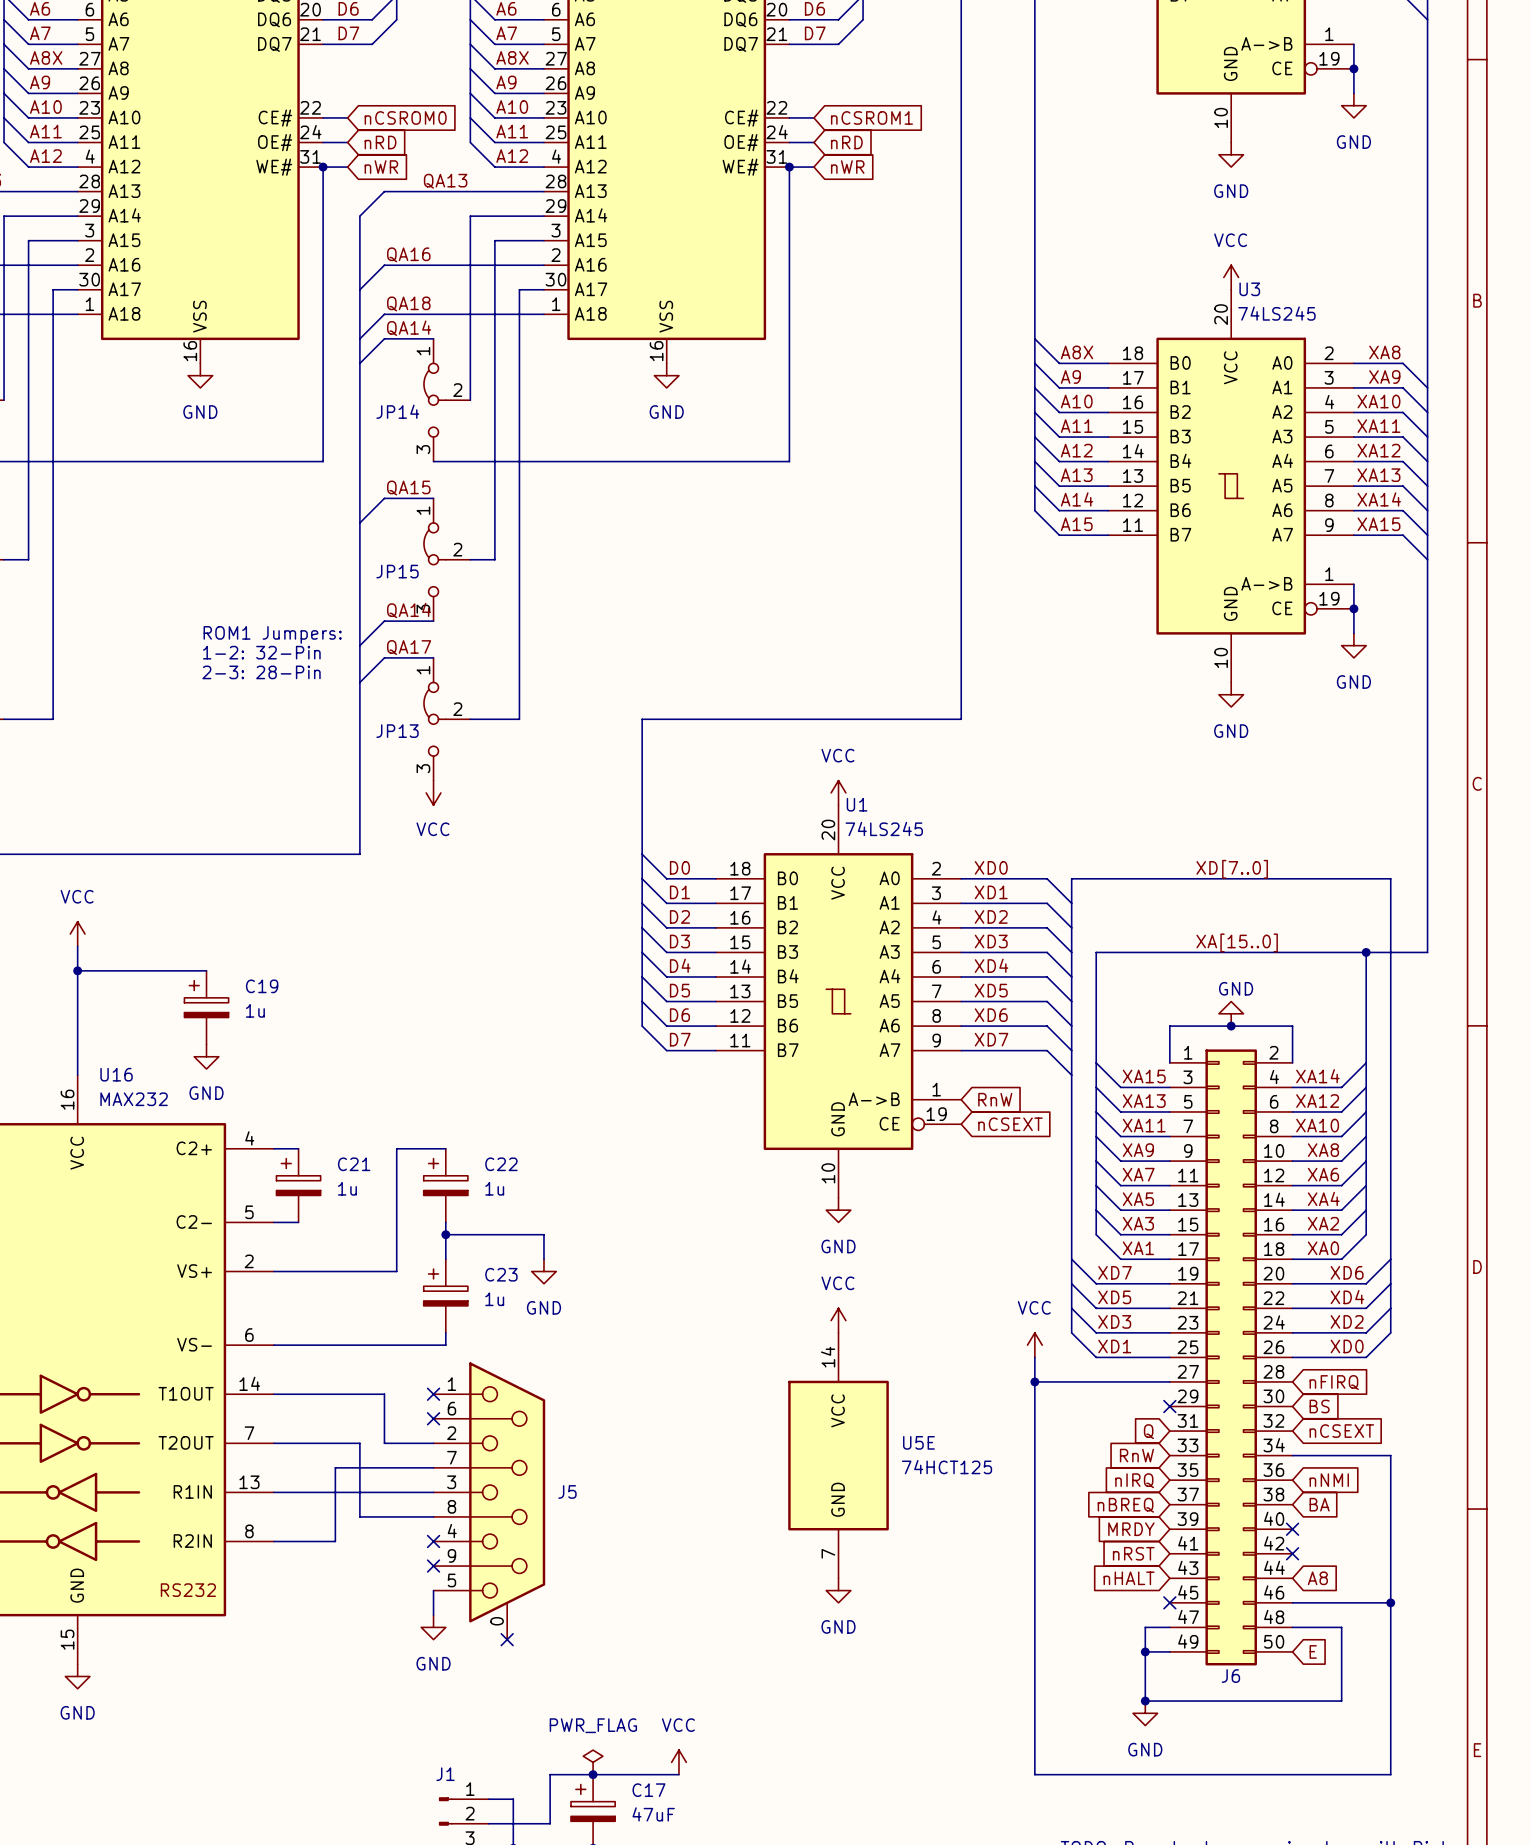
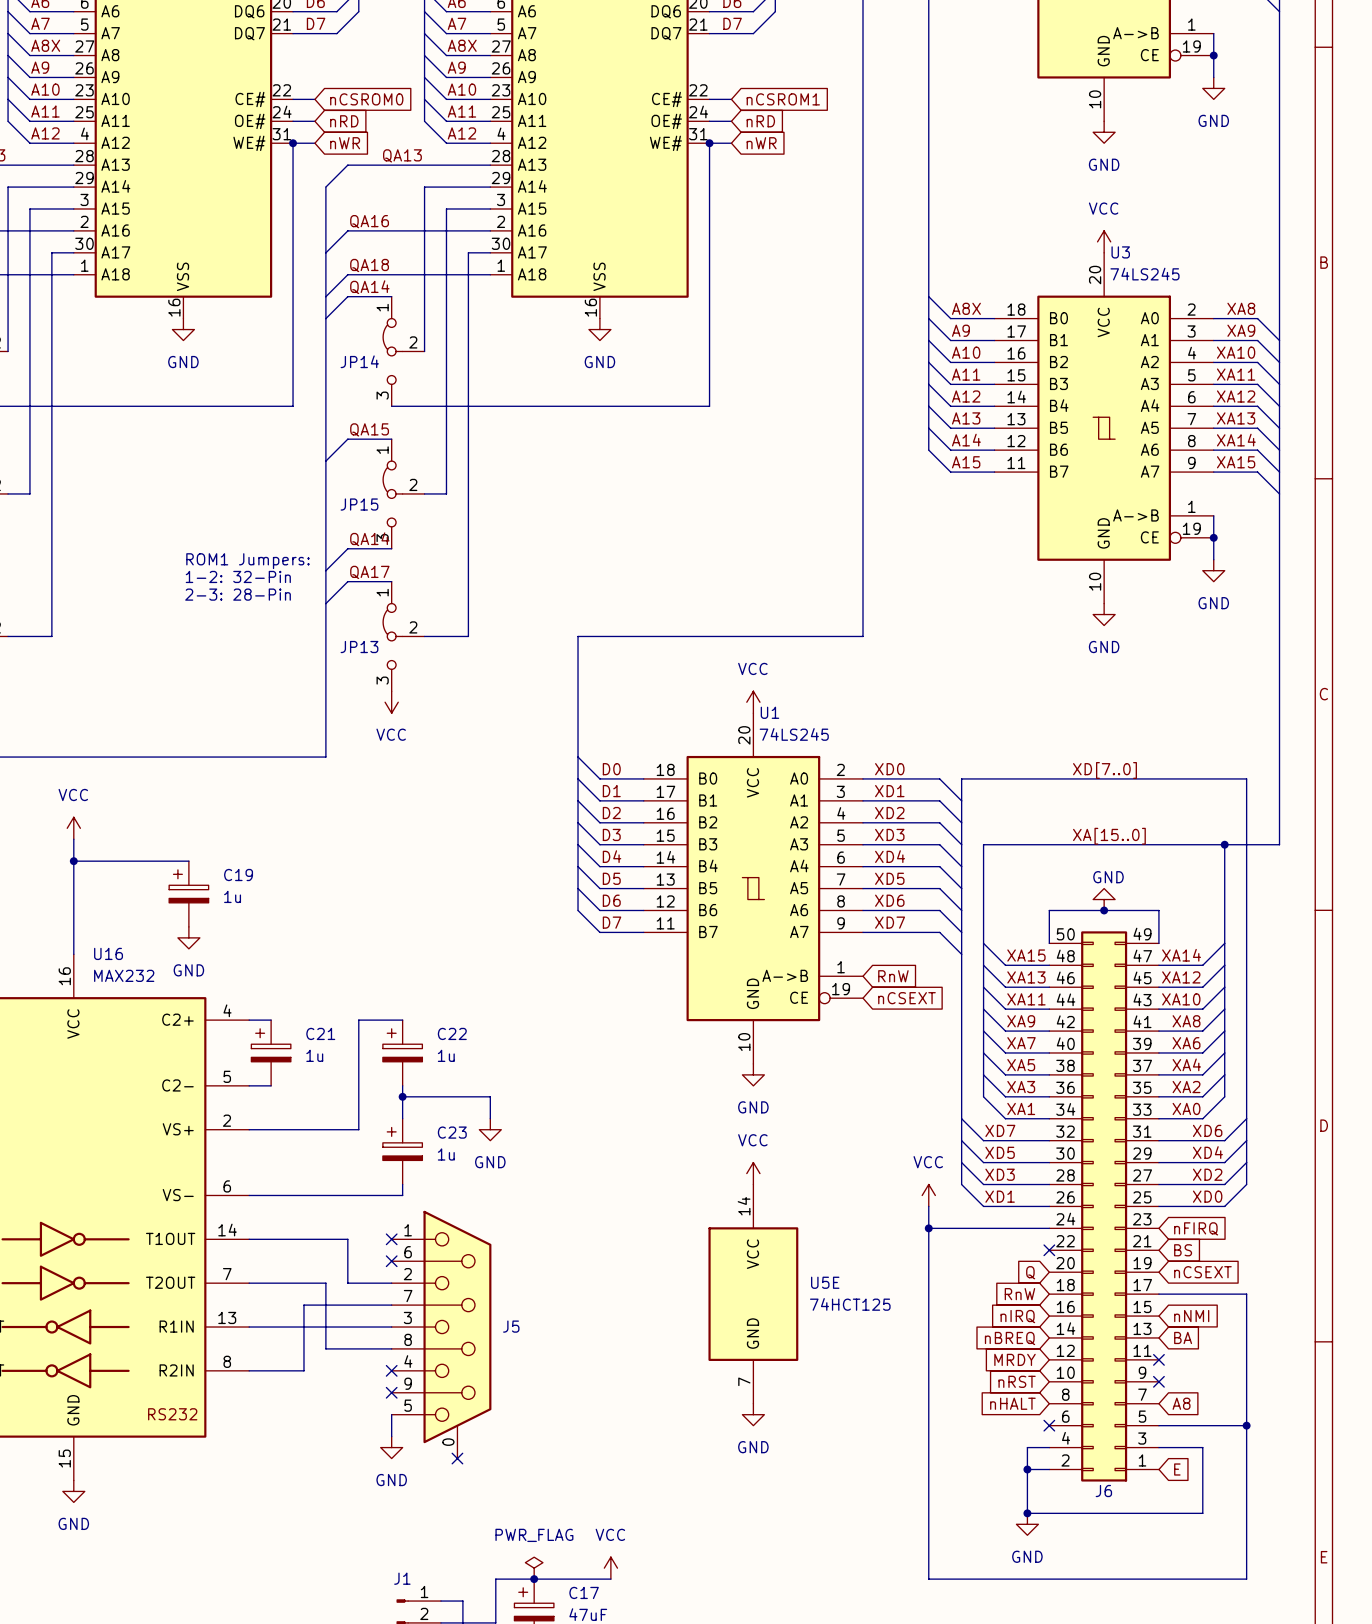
J6 rotation: 0° (1231, 1357) -> 180° (1104, 1206)

